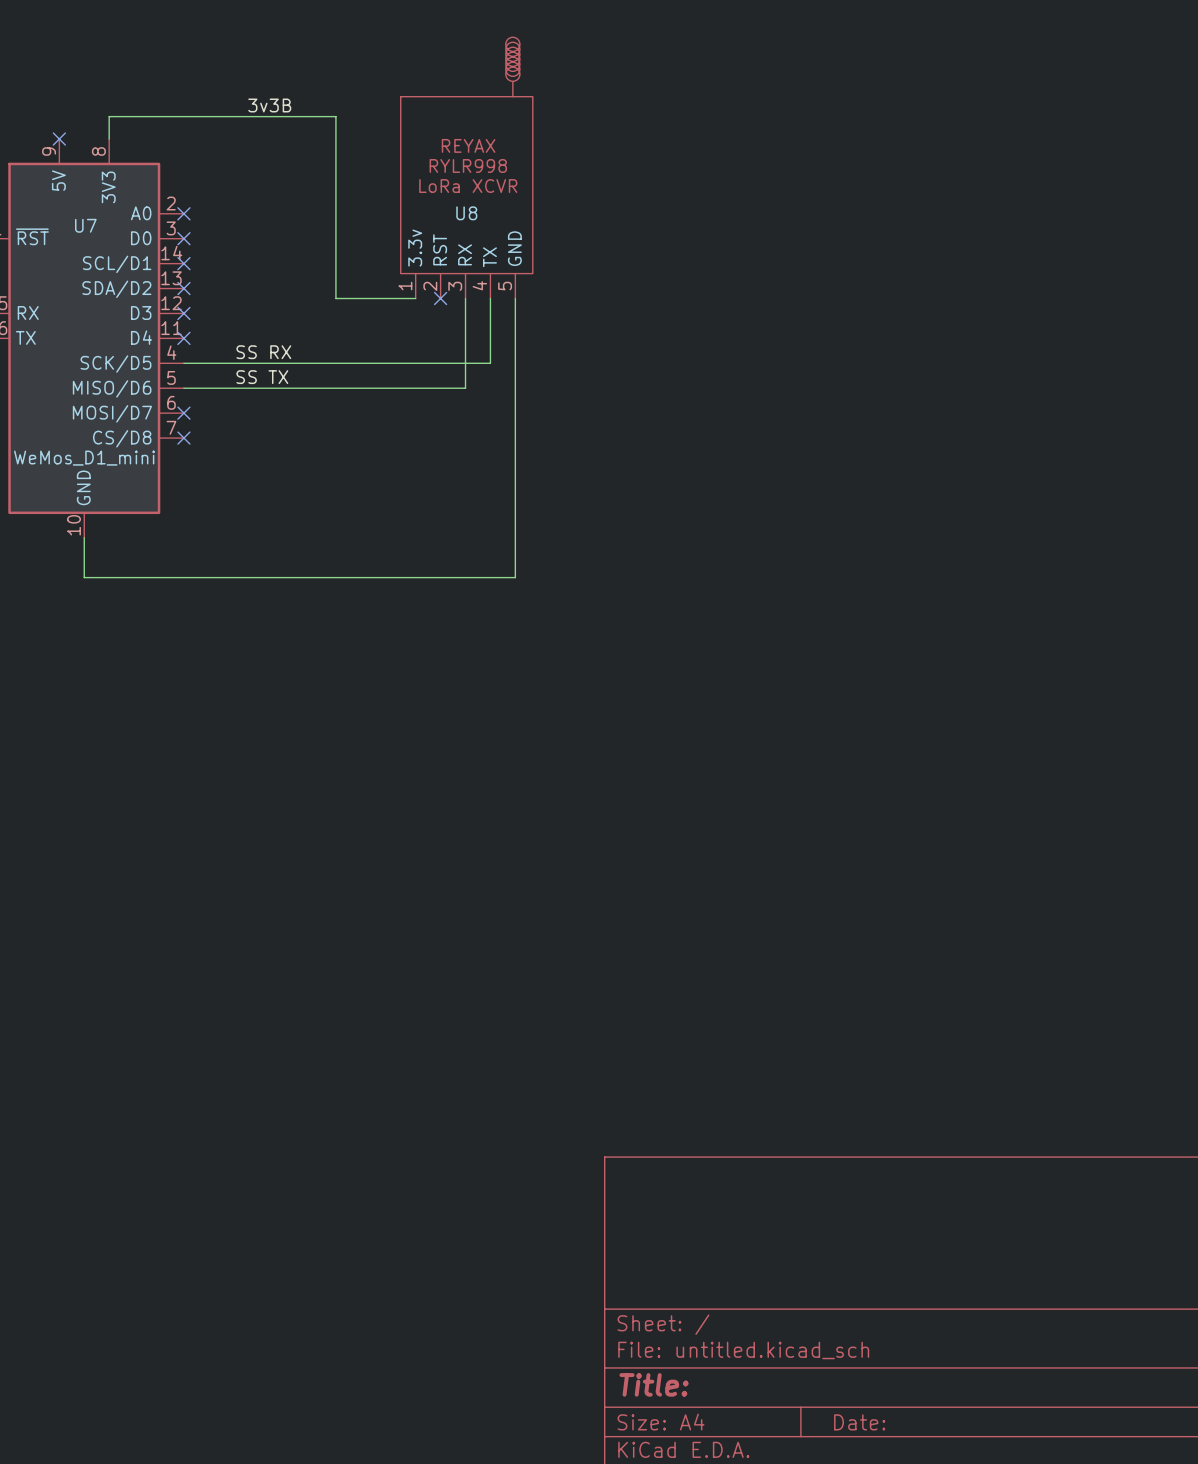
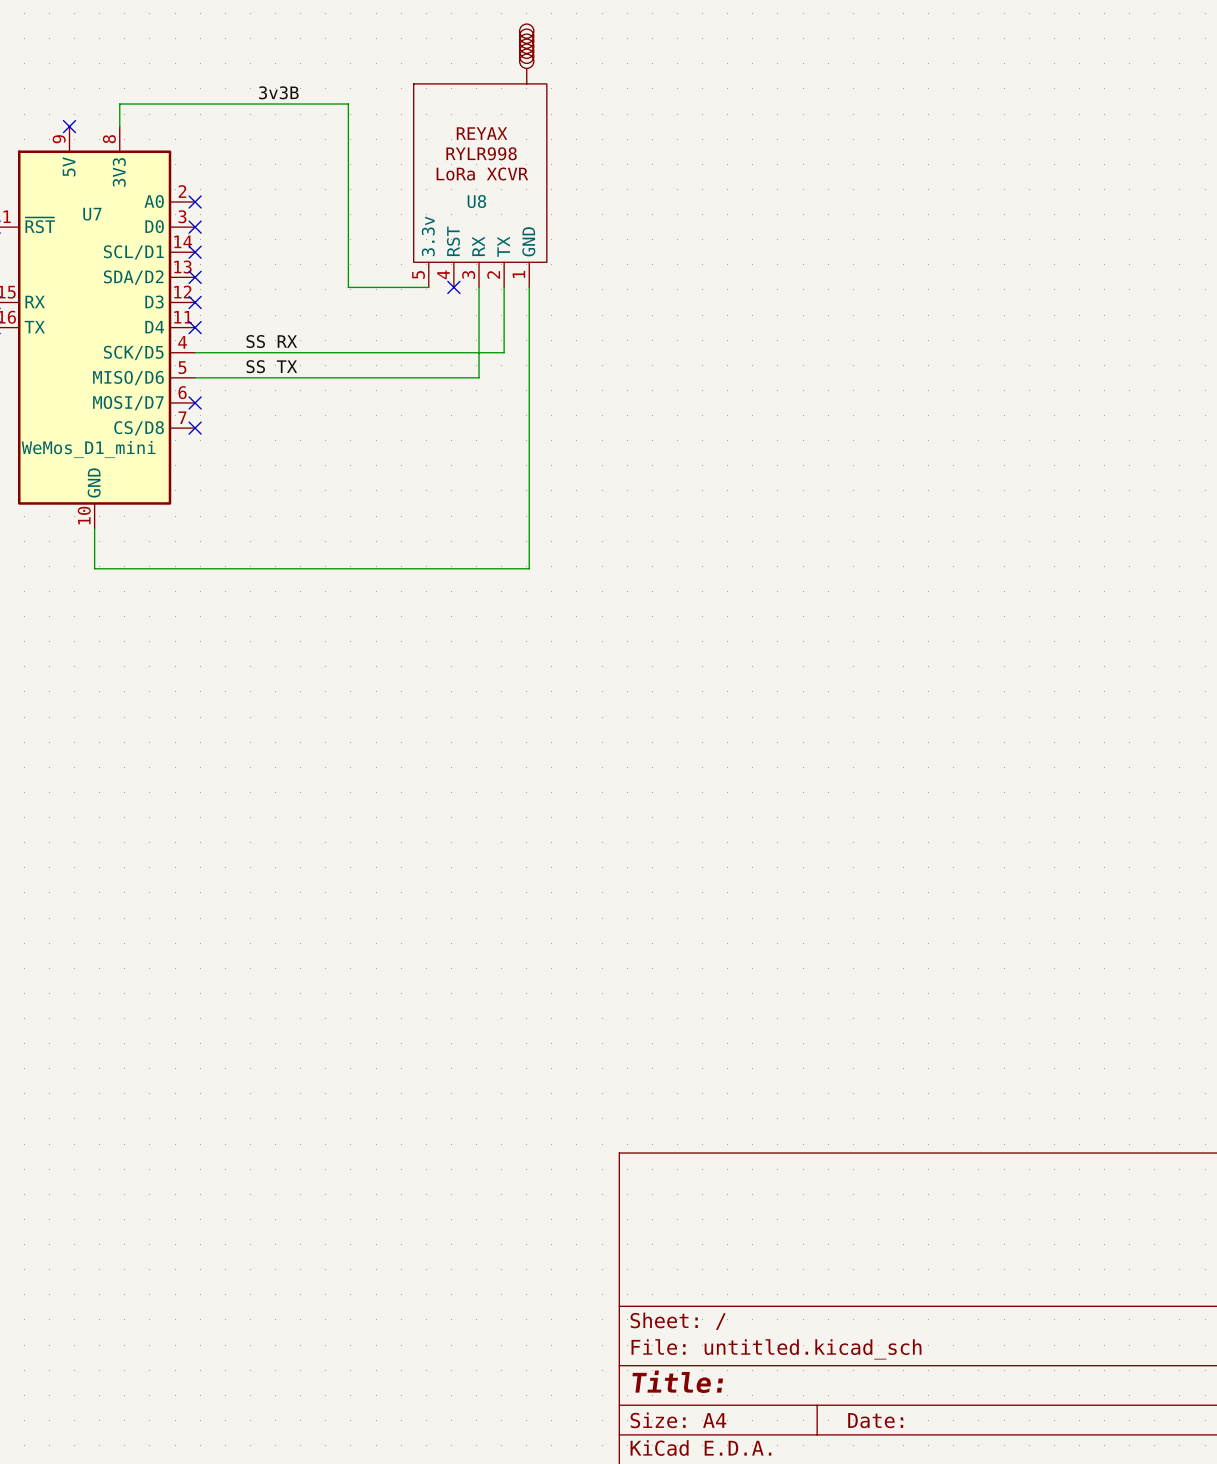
U8 pin number: 4 (479, 285) -> 2 (493, 274)
U8 pin number: 1 (405, 286) -> 5 (418, 274)
U8 pin number: 2 (430, 286) -> 4 (443, 274)
U8 pin number: 5 (505, 286) -> 1 (518, 274)

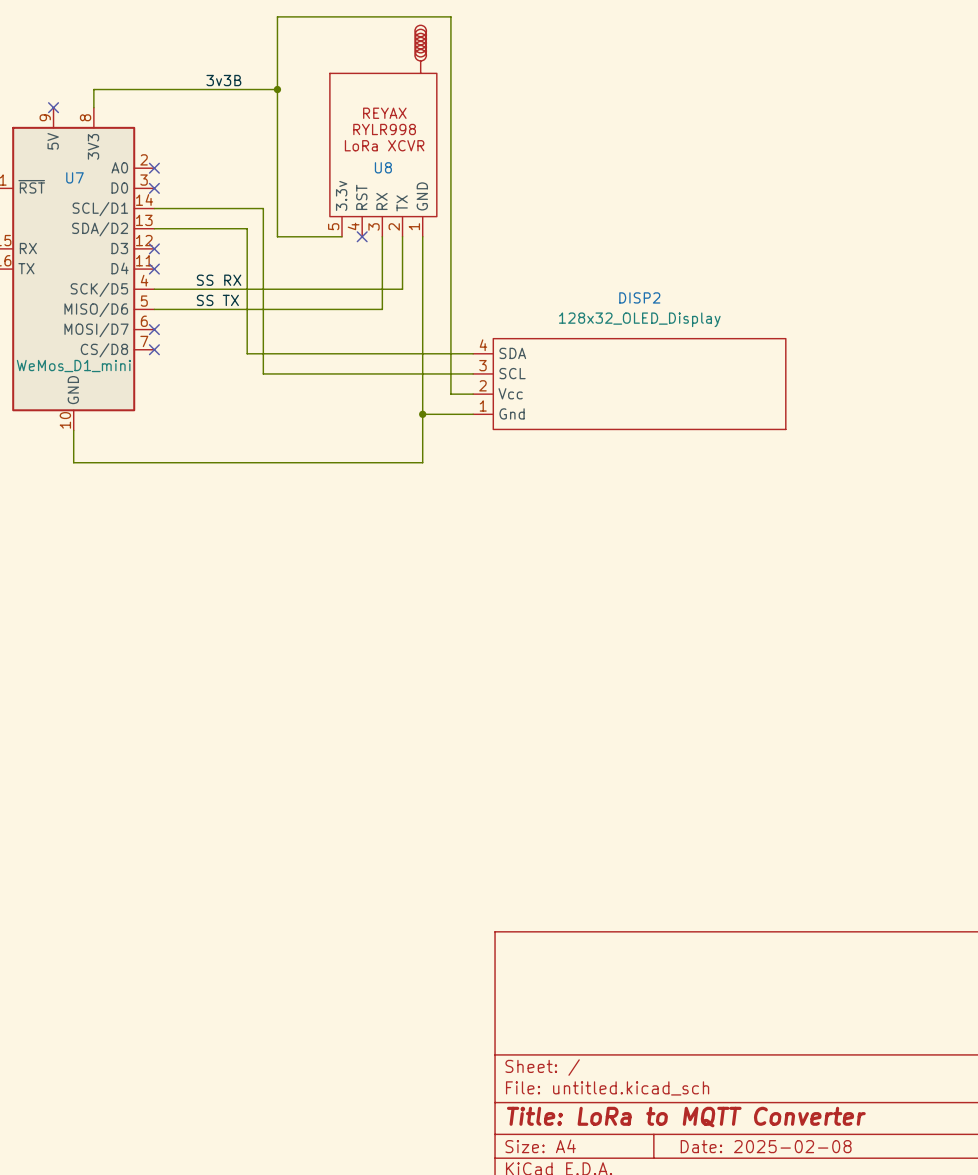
wire: none -> (277, 89) (277, 16) (450, 16) (450, 394) (473, 394)
junction: none -> (277, 89)
wire: none -> (154, 208) (263, 208) (263, 373) (473, 373)
no-connect mark: (195, 252) -> none
wire: none -> (154, 228) (247, 228) (247, 353) (473, 353)
no-connect mark: (195, 277) -> none
DISP2: none -> 128x32_OLED_Display (629, 384)
wire: none -> (422, 414) (473, 414)
junction: none -> (422, 414)
title block: Title: (677, 1381) -> Title: LoRa to MQTT Converter (686, 1117)
title block: Date: (875, 1420) -> Date: 2025-02-08 (766, 1146)

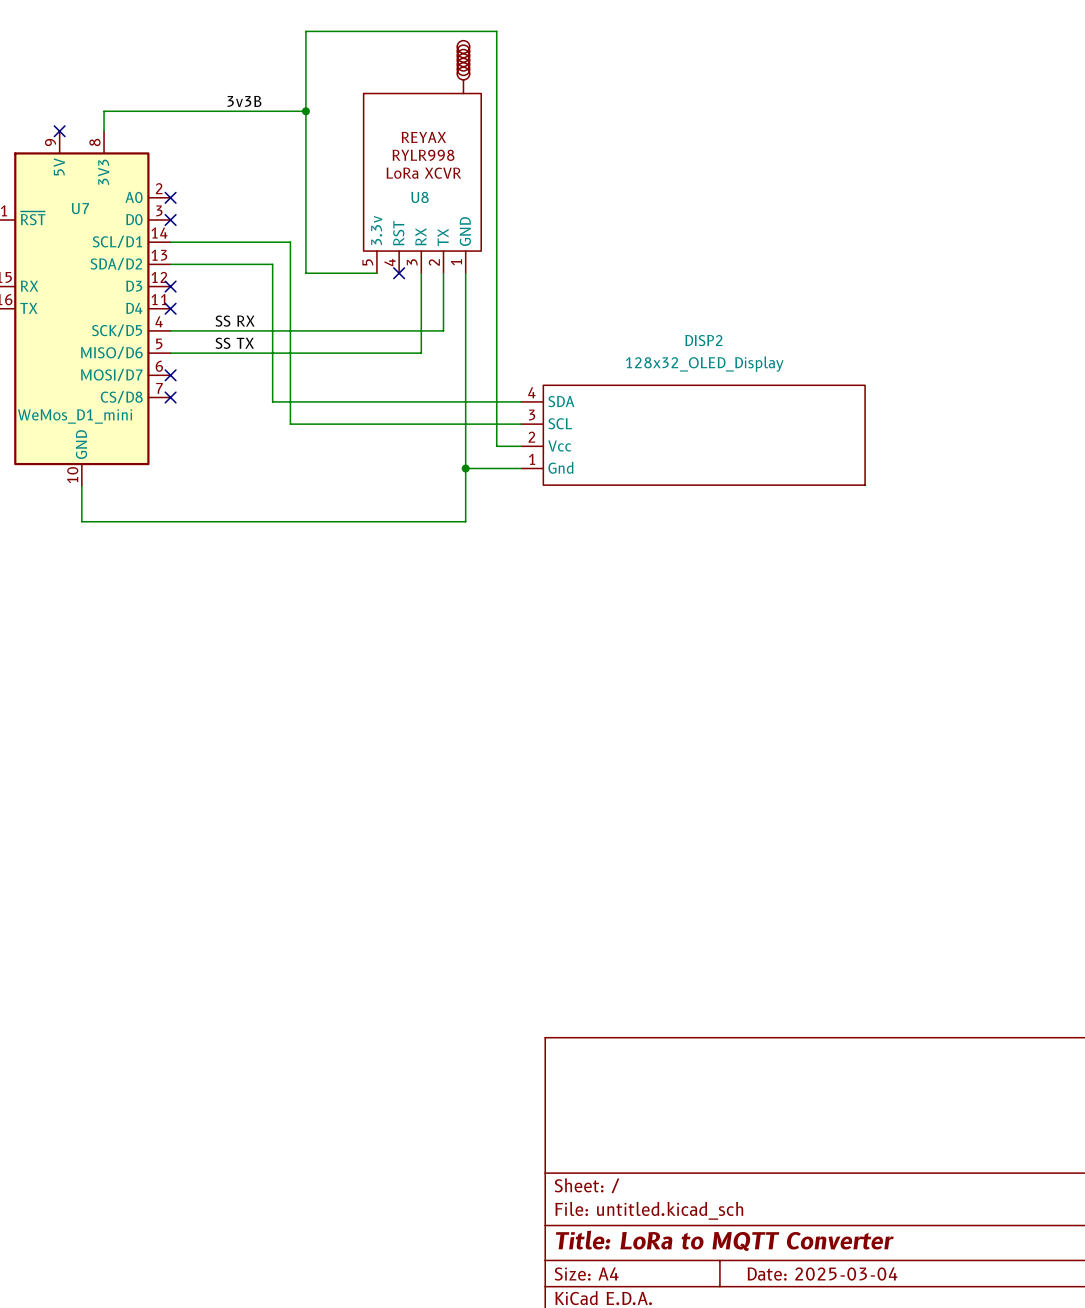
title block: Date: 2025-02-08 (766, 1146) -> Date: 2025-03-04 (822, 1274)

